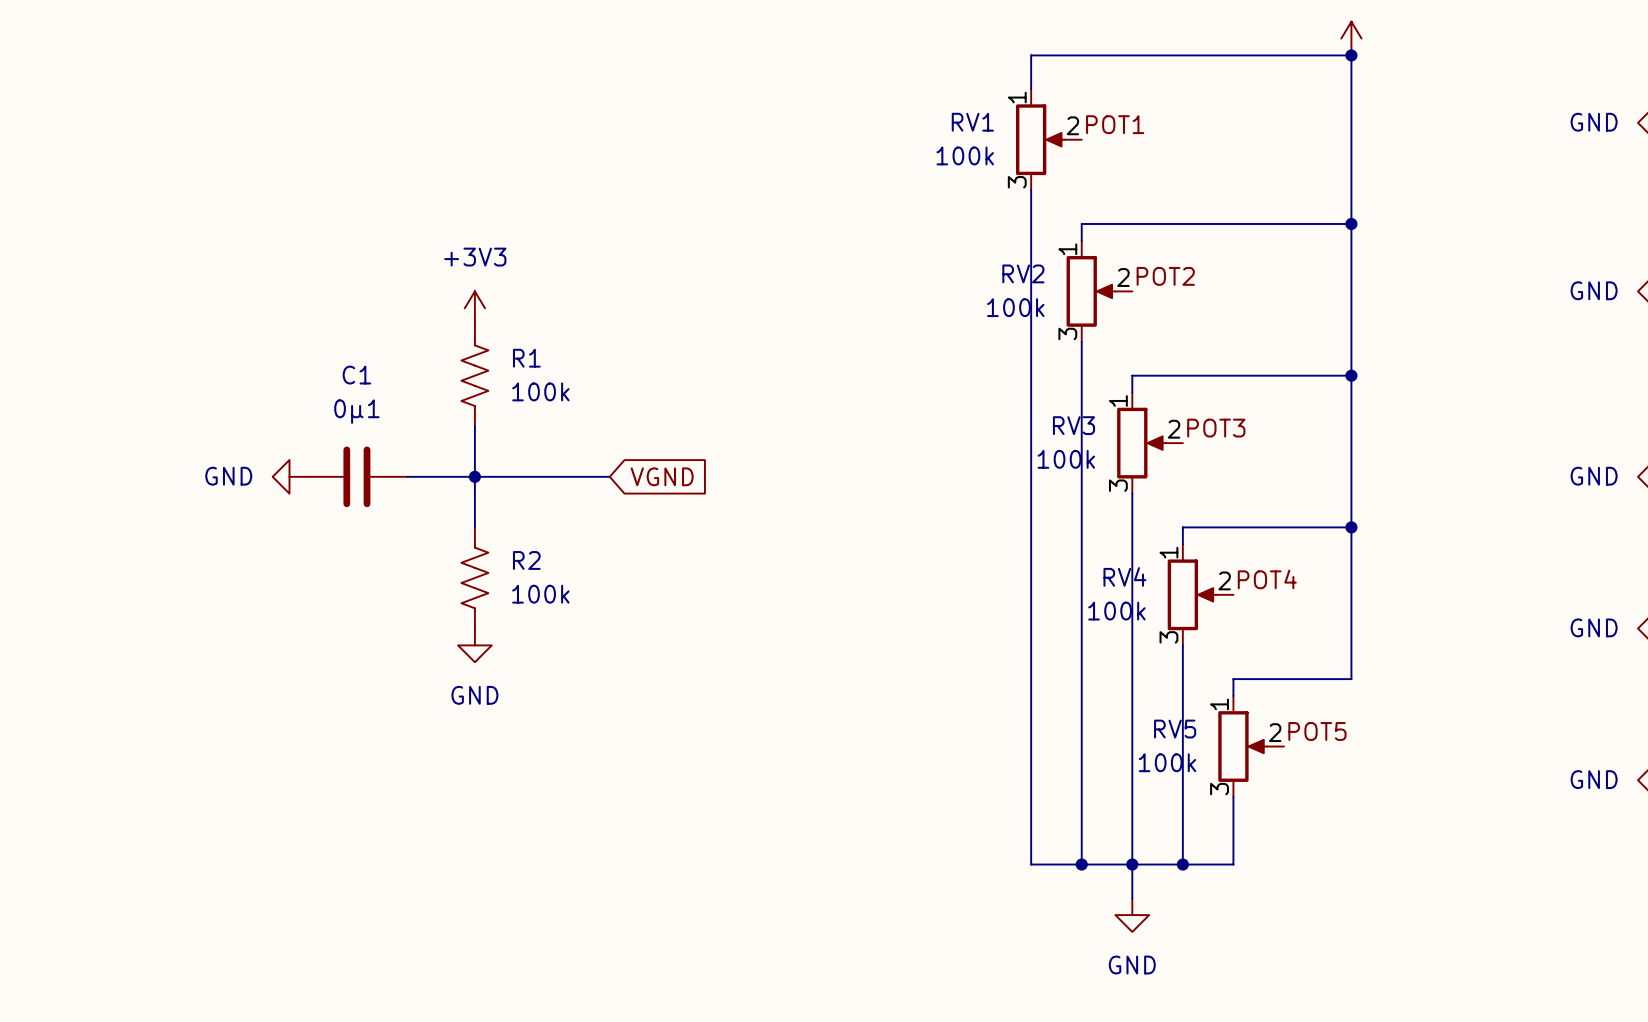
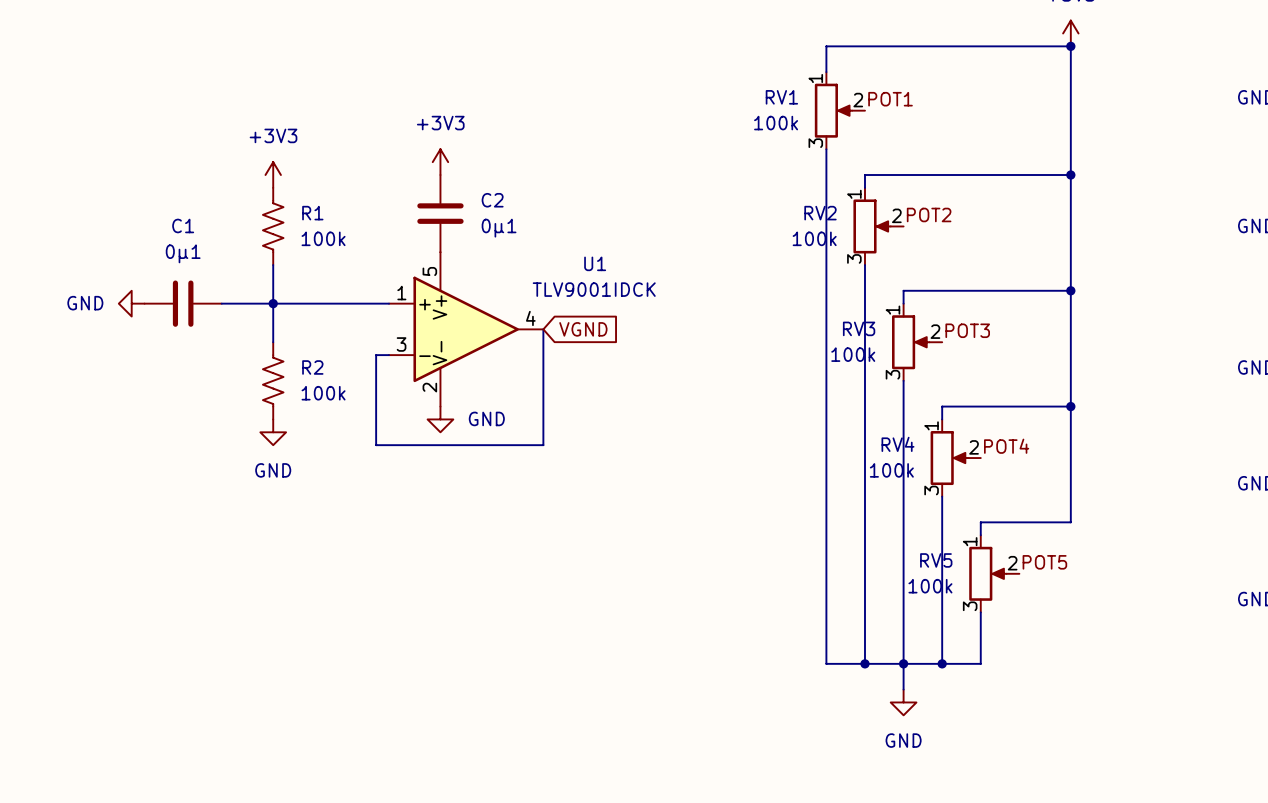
power symbol: none -> +3V3 (440, 162)
power symbol: none -> +3V3 (273, 175)
C2: none -> 0µ1 (440, 213)
power symbol: +3V3 (474, 308) -> none
R1 position: (474, 375) -> (273, 226)
power symbol: none -> GND (131, 303)
wire: none -> (221, 303) (389, 303)
junction: none -> (273, 303)
wire: (474, 426) (474, 527) -> (273, 265) (273, 342)
U1: none -> TLV9001IDCK (466, 329)
wire: none -> (543, 329) (543, 445) (376, 445) (376, 355) (389, 355)
power symbol rotation: 0° (289, 476) -> 90° counterclockwise (273, 432)
power symbol position: GND (289, 476) -> GND (273, 432)
C1 position: (356, 476) -> (183, 303)
wire: (407, 476) (609, 476) -> none
junction: (474, 476) -> none
global label position: VGND (662, 476) -> VGND (583, 329)
power symbol: none -> GND (440, 419)
R2 position: (474, 577) -> (273, 380)
power symbol: GND (474, 645) -> none

